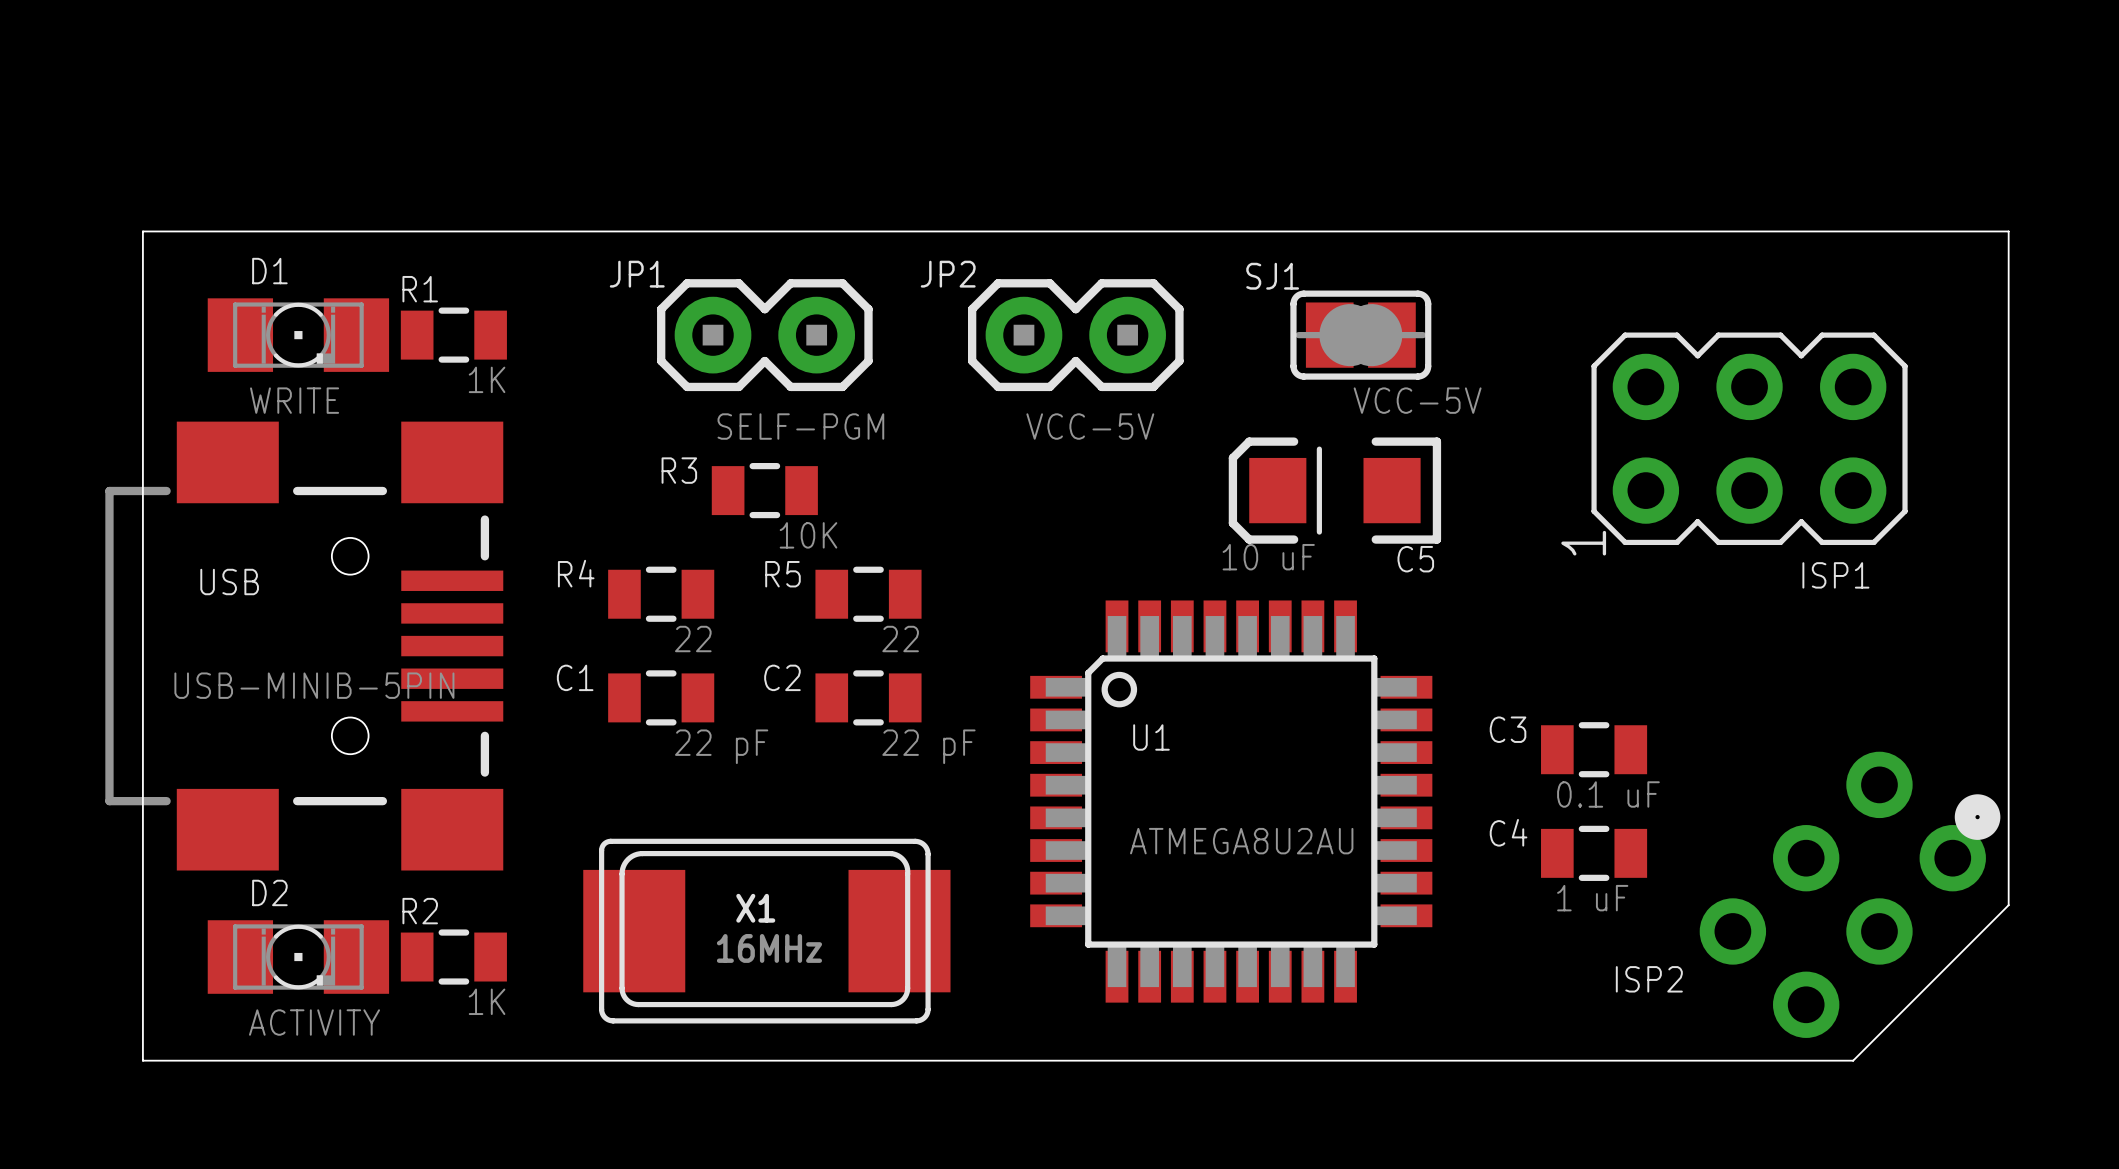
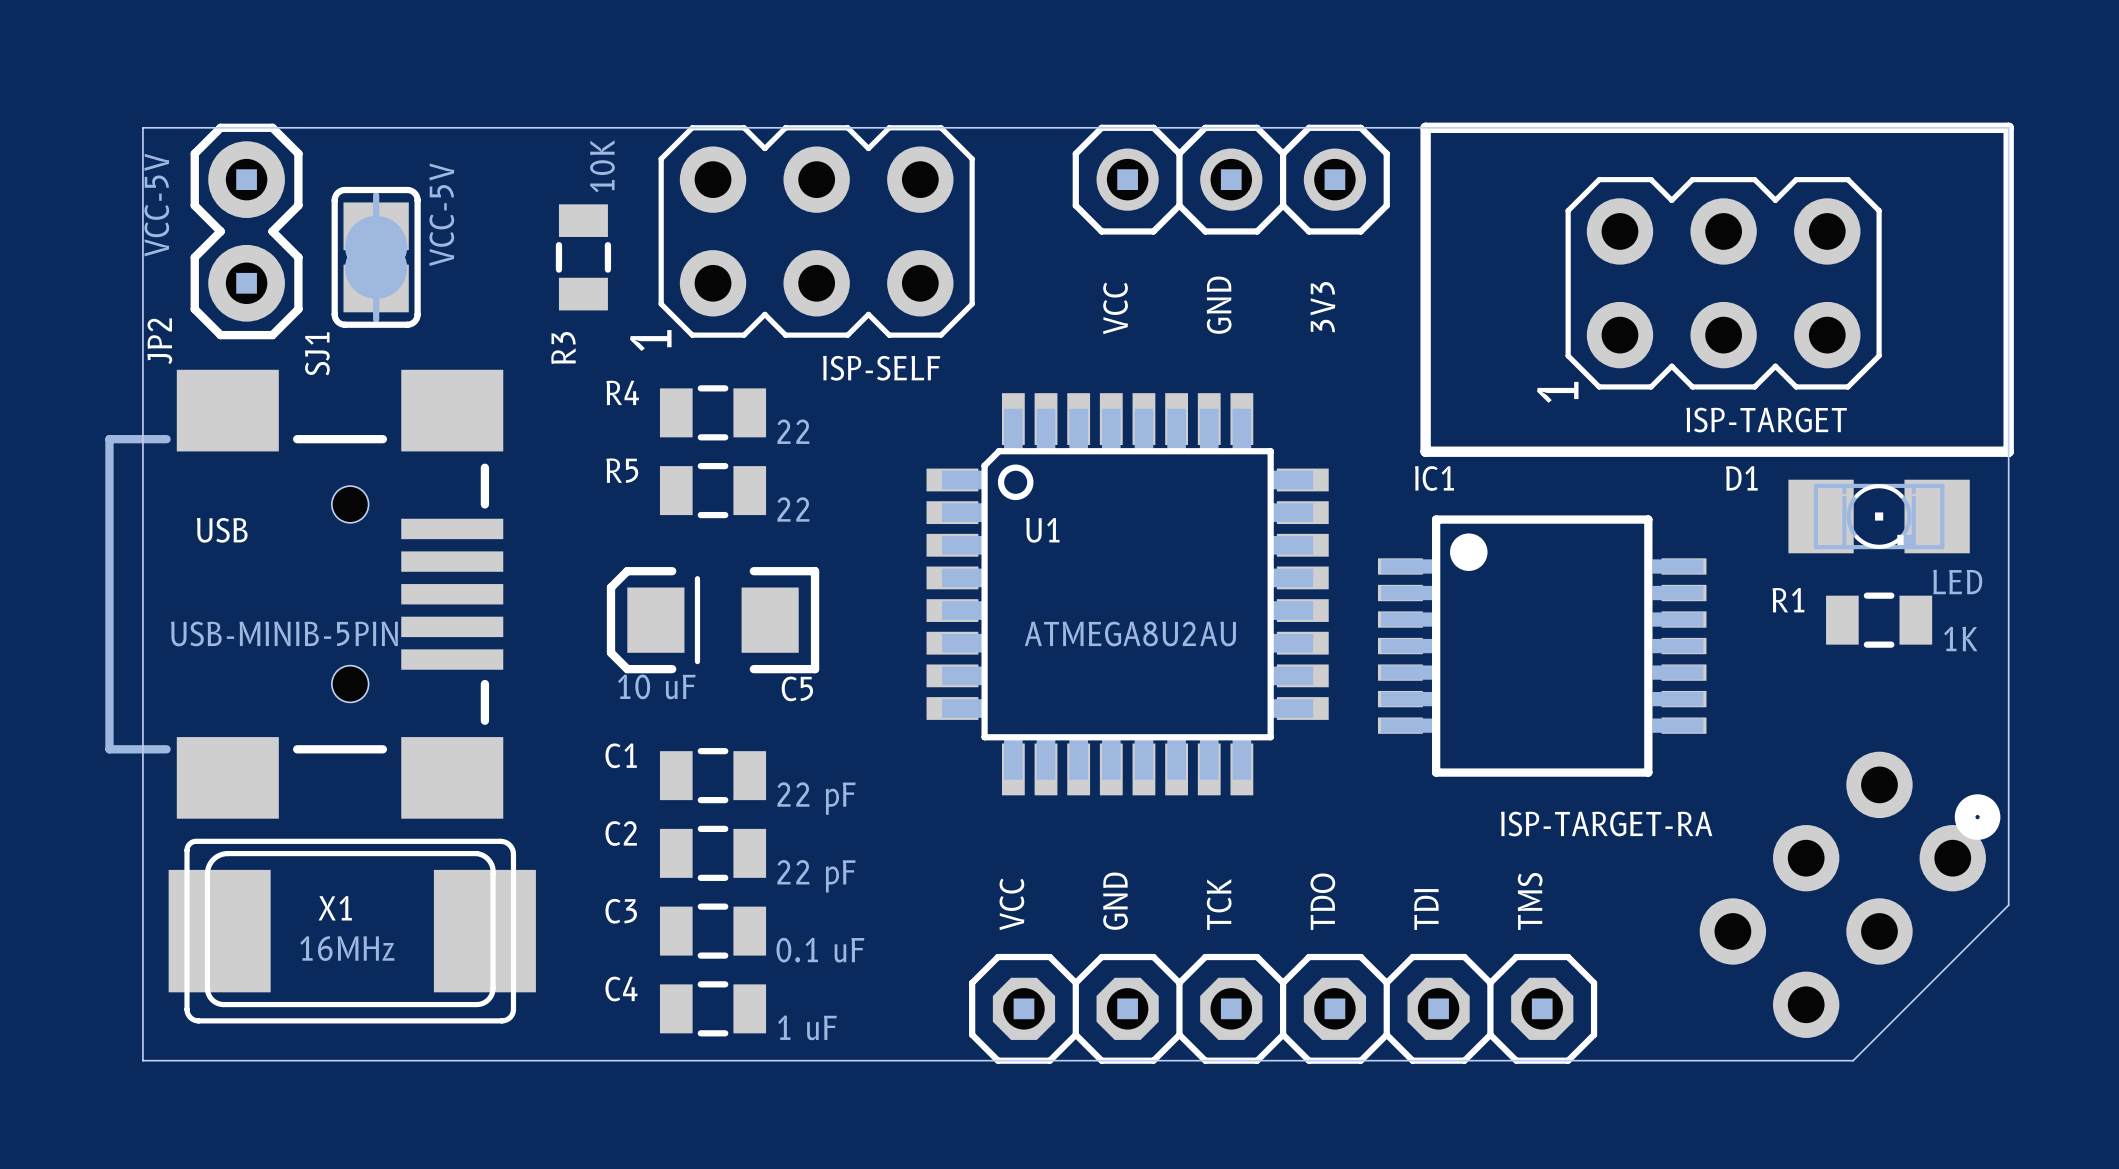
line: none -> (1425, 127) (2008, 127) (2008, 451) (1425, 451) (1425, 127)
part: none -> (1231, 179)
board edge: (142, 231) (2008, 231) -> (142, 231) (142, 127) (2008, 127) (2008, 231)
ISP-SELF: none -> (816, 231)
D1 name position: D1 (269, 271) -> D1 (1741, 478)
JP2 name position: JP2 (948, 274) -> JP2 (159, 341)
SJ1 name position: SJ1 (1272, 276) -> SJ1 (317, 353)
ISP-TARGET: none -> (1723, 283)
R1 name position: R1 (420, 289) -> R1 (1788, 600)
text: none -> GND (1219, 305)
text: none -> VCC (1115, 308)
text: none -> 3V3 (1322, 307)
D1 position: (298, 335) -> (1879, 516)
R1 position: (453, 335) -> (1879, 620)
JP1: SELF-PGM (764, 335) -> none
JP2 rotation: 0° (1075, 335) -> 90° clockwise (246, 231)
JP2 position: (1075, 335) -> (246, 231)
SJ1 rotation: 0° (1360, 335) -> 90° clockwise (376, 257)
SJ1 position: (1360, 335) -> (376, 257)
R1 value position: 1K (487, 379) -> 1K (1960, 639)
D1 value: WRITE (294, 400) -> LED (1957, 582)
SJ1 value position: VCC-5V (1417, 400) -> VCC-5V (441, 214)
ISP1: (1749, 438) -> none
R3 name position: R3 (679, 470) -> R3 (563, 347)
R3 rotation: 0° (764, 490) -> 90° clockwise (583, 257)
R3 position: (764, 490) -> (583, 257)
C5 position: (1334, 490) -> (713, 620)
R3 value position: 10K (808, 535) -> 10K (602, 166)
R4 position: (661, 594) -> (713, 412)
R5 position: (868, 594) -> (713, 490)
R4 value position: 22 (693, 639) -> 22 (793, 431)
R5 value position: 22 (900, 639) -> 22 (793, 509)
USB position: (304, 646) -> (304, 594)
IC1: none -> (1542, 646)
C1 position: (661, 697) -> (713, 775)
C2 position: (868, 697) -> (713, 853)
C1 value position: 22 pF (721, 746) -> 22 pF (816, 798)
C2 value position: 22 pF (928, 746) -> 22 pF (816, 876)
C3 position: (1594, 749) -> (713, 931)
C3 value position: 0.1 uF (1608, 794) -> 0.1 uF (820, 950)
U1 position: (1231, 801) -> (1127, 594)
C4 position: (1594, 853) -> (713, 1008)
text: none -> GND (1115, 901)
text: none -> VCC (1011, 904)
text: none -> TMS (1530, 901)
text: none -> TCK (1219, 904)
text: none -> TDO (1322, 901)
C4 value position: 1 uF (1592, 898) -> 1 uF (807, 1027)
text: none -> TDI (1426, 909)
X1 position: (766, 931) -> (352, 931)
D2: ACTIVITY (298, 957) -> none
R2: 1K (453, 957) -> none
ISP2 name: ISP2 (1649, 979) -> ISP-TARGET-RA (1606, 823)
part: none -> (1283, 1008)

